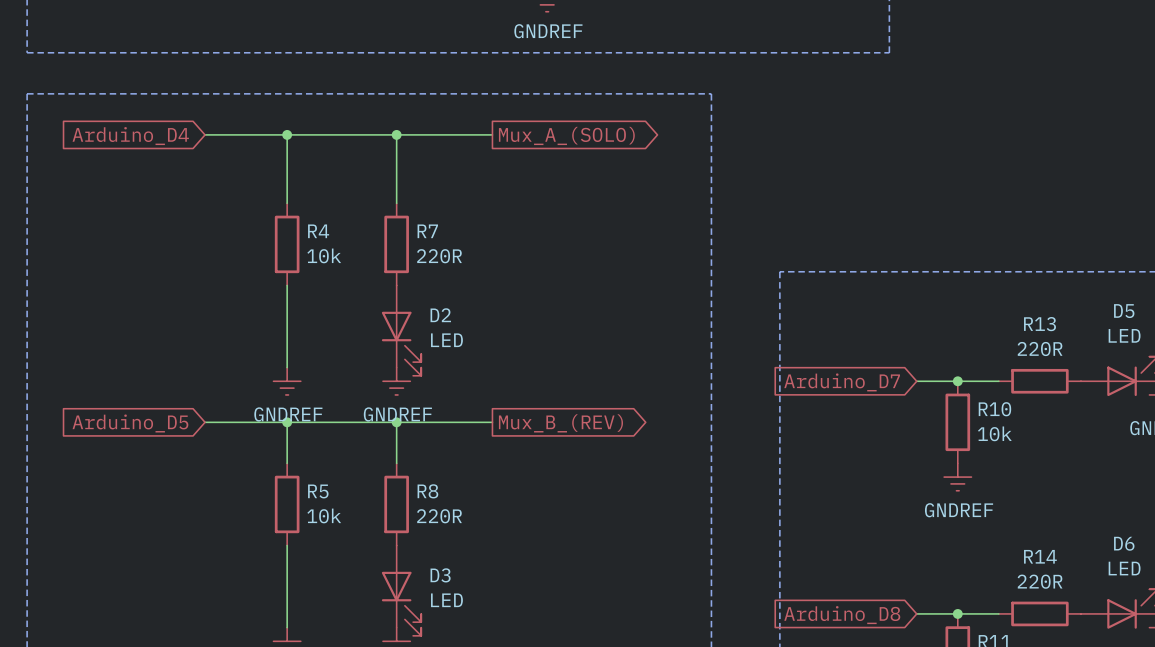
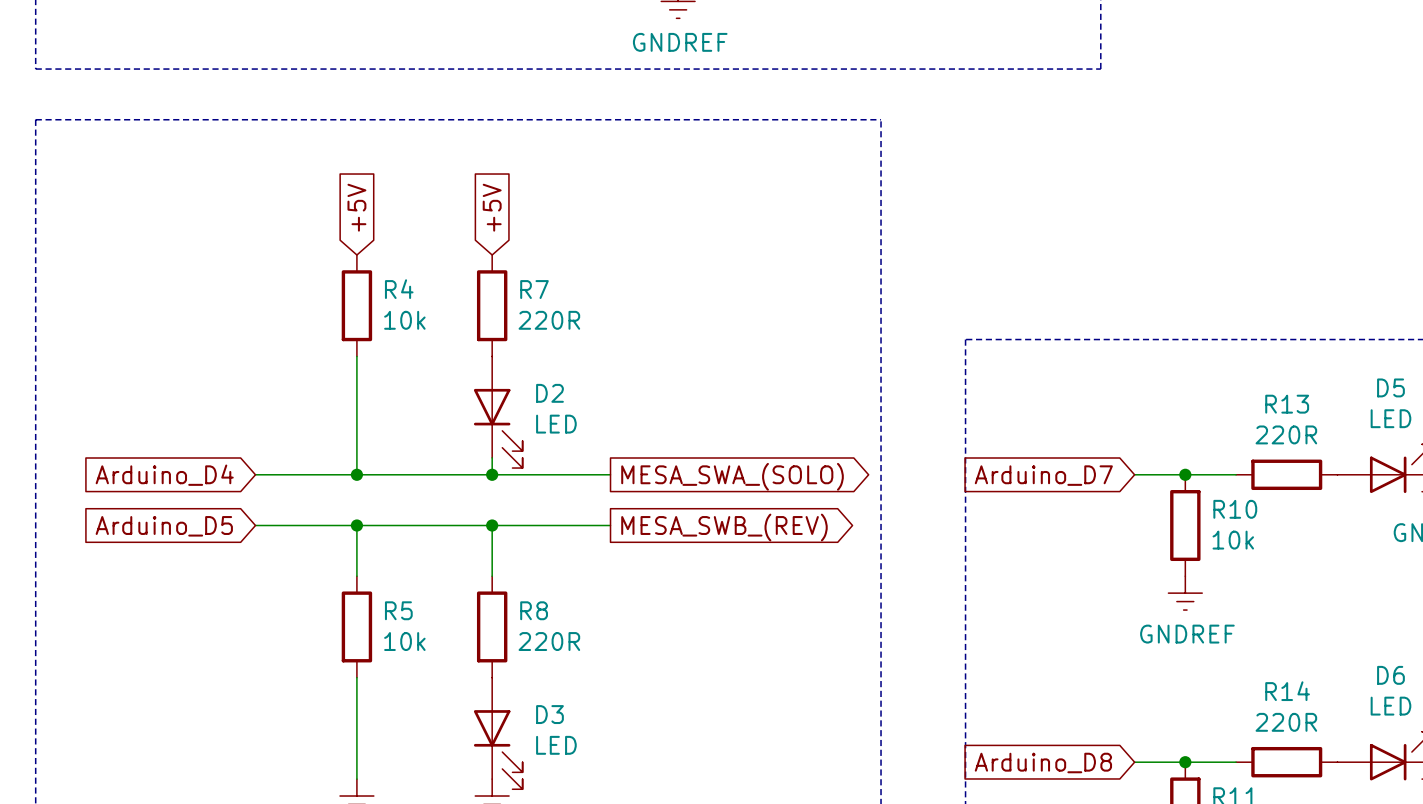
wire: (205, 134) (492, 134) -> (255, 474) (610, 474)
wire: (287, 134) (287, 203) -> none
junction: (287, 134) -> none
wire: (396, 134) (396, 203) -> none
junction: (396, 134) -> none
global label: Mux_A_(SOLO) (566, 135) -> none
global label position: Arduino_D4 (130, 136) -> Arduino_D4 (164, 475)
global label: none -> +5V (356, 207)
global label: none -> +5V (492, 207)
junction: none -> (356, 474)
power symbol: GNDREF (287, 381) -> none
junction: none -> (492, 474)
power symbol: GNDREF (396, 381) -> none
global label: none -> MESA_SWA_(SOLO) (732, 476)
global label: Mux_B_(REV) (560, 423) -> MESA_SWB_(REV) (724, 527)

